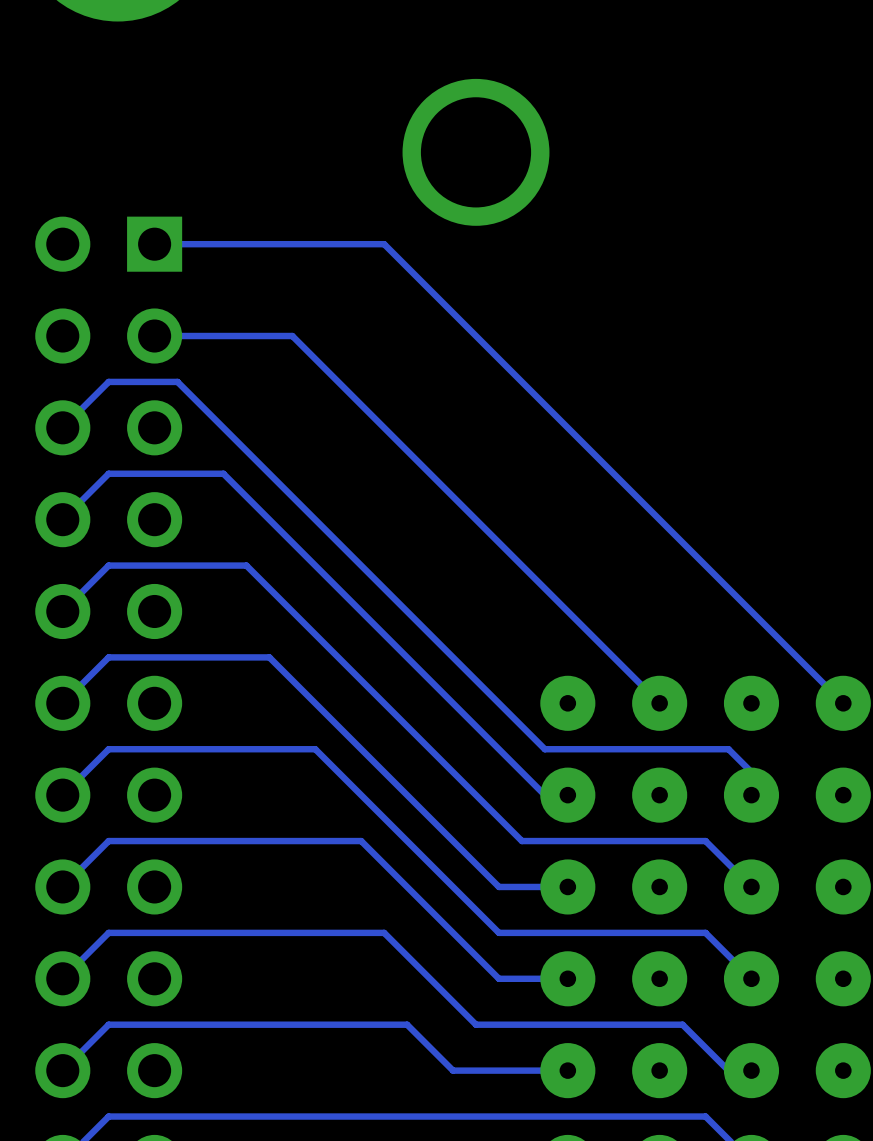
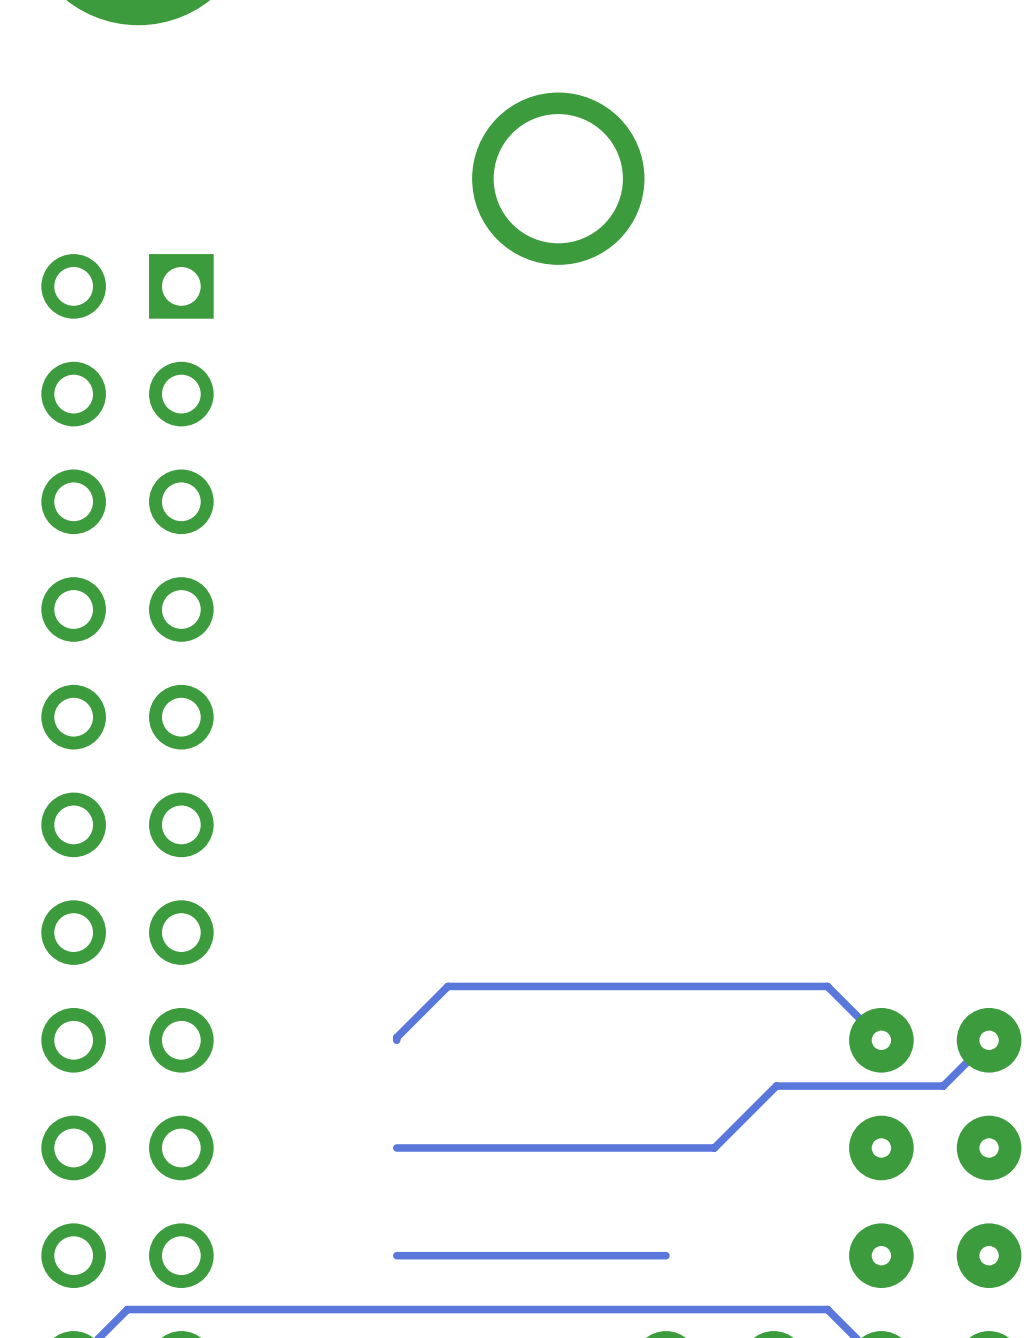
track: (154, 244) (384, 244) (843, 703) -> none
track: (154, 336) (292, 336) (659, 703) -> none
track: (62, 427) (108, 381) (177, 381) (544, 749) (728, 749) (751, 772) (751, 795) -> none
track: (62, 519) (108, 473) (223, 473) (544, 795) (567, 795) -> none
track: (62, 611) (108, 565) (246, 565) (521, 841) -> (396, 1040) (396, 1037) (447, 986) (612, 986)
track: (62, 703) (108, 657) (269, 657) (498, 886) (567, 886) -> none
part: (567, 703) -> none
part: (659, 703) -> none
part: (751, 703) -> none
part: (843, 703) -> none
track: (62, 795) (108, 749) (315, 749) (498, 932) (705, 932) (751, 978) -> none
part: (567, 795) -> none
part: (659, 795) -> none
part: (751, 795) -> none
part: (843, 795) -> none
track: (62, 886) (108, 841) (361, 841) (498, 978) -> (396, 1147) (585, 1147)
part: (567, 886) -> none
part: (659, 886) -> none
track: none -> (989, 1040) (943, 1086) (776, 1086) (714, 1147) (665, 1147)
track: (62, 978) (108, 932) (384, 932) (476, 1024) (682, 1024) (728, 1070) (751, 1070) -> none
part: (567, 978) -> none
part: (659, 978) -> none
track: (453, 1070) (407, 1024) (108, 1024) (62, 1070) -> (531, 1255) (396, 1255)
part: (567, 1070) -> none
part: (659, 1070) -> none

